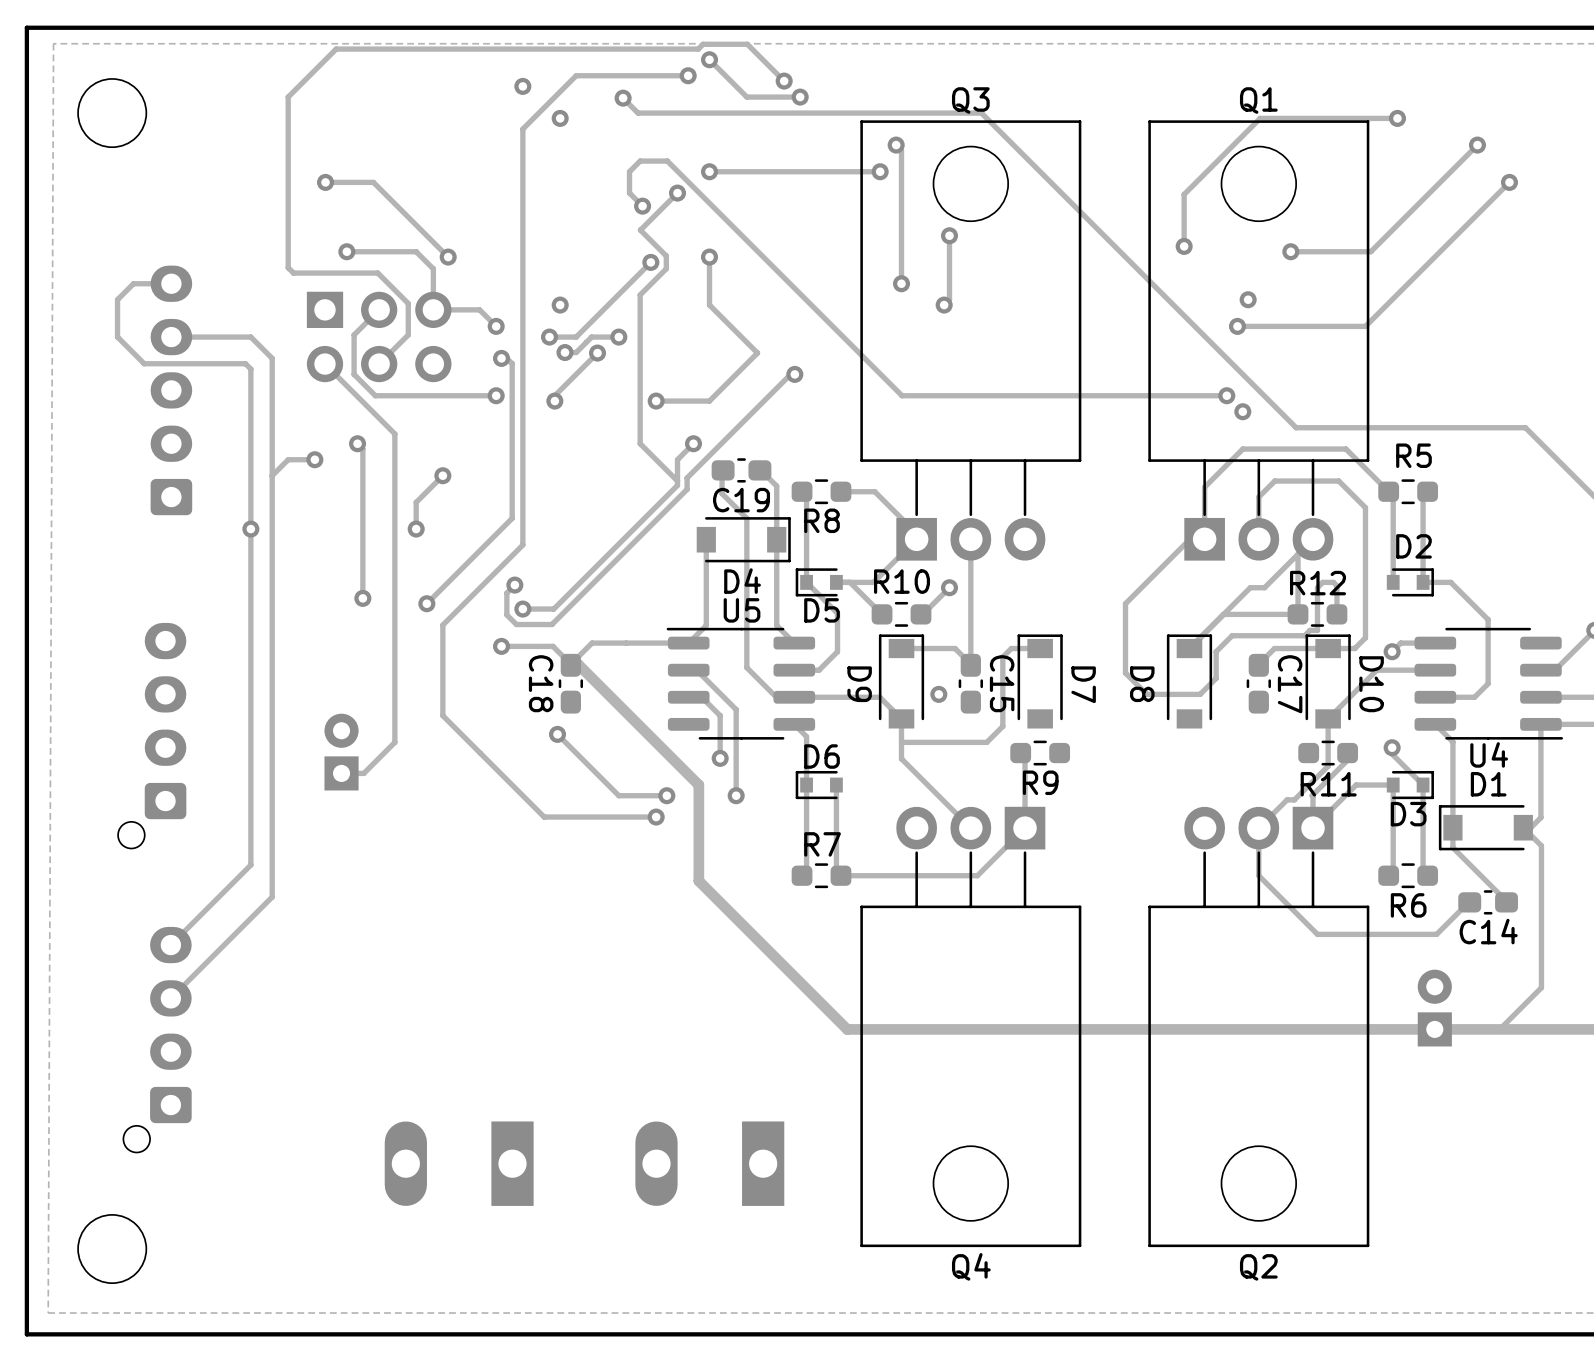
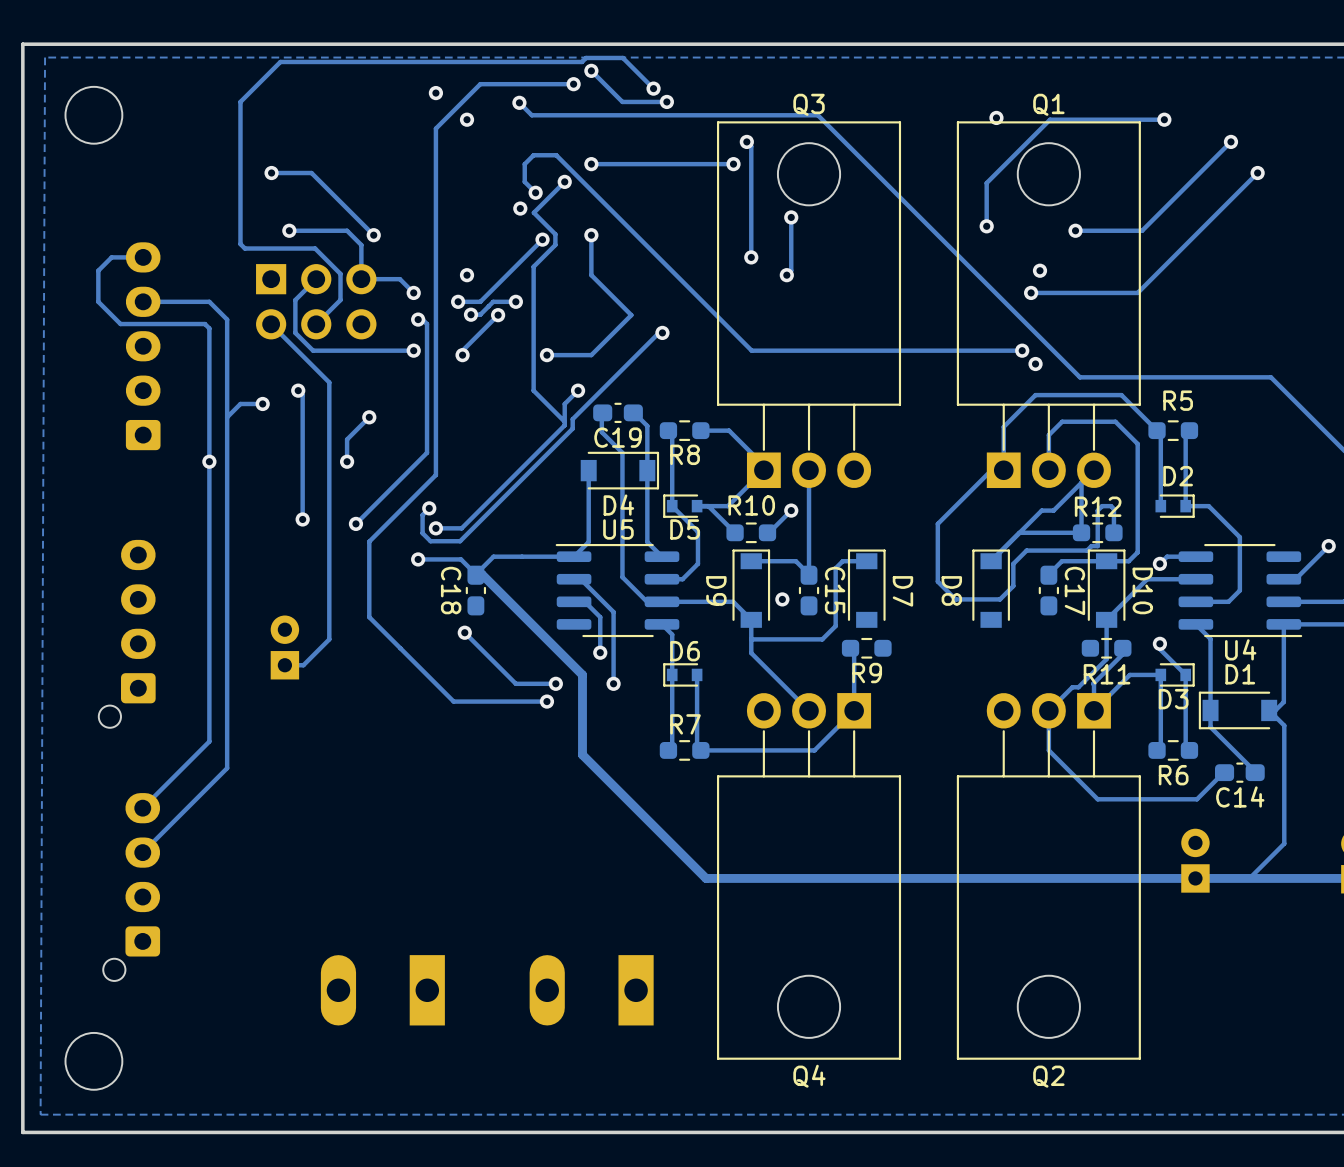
via: none -> (996, 117)
via: none -> (520, 208)

